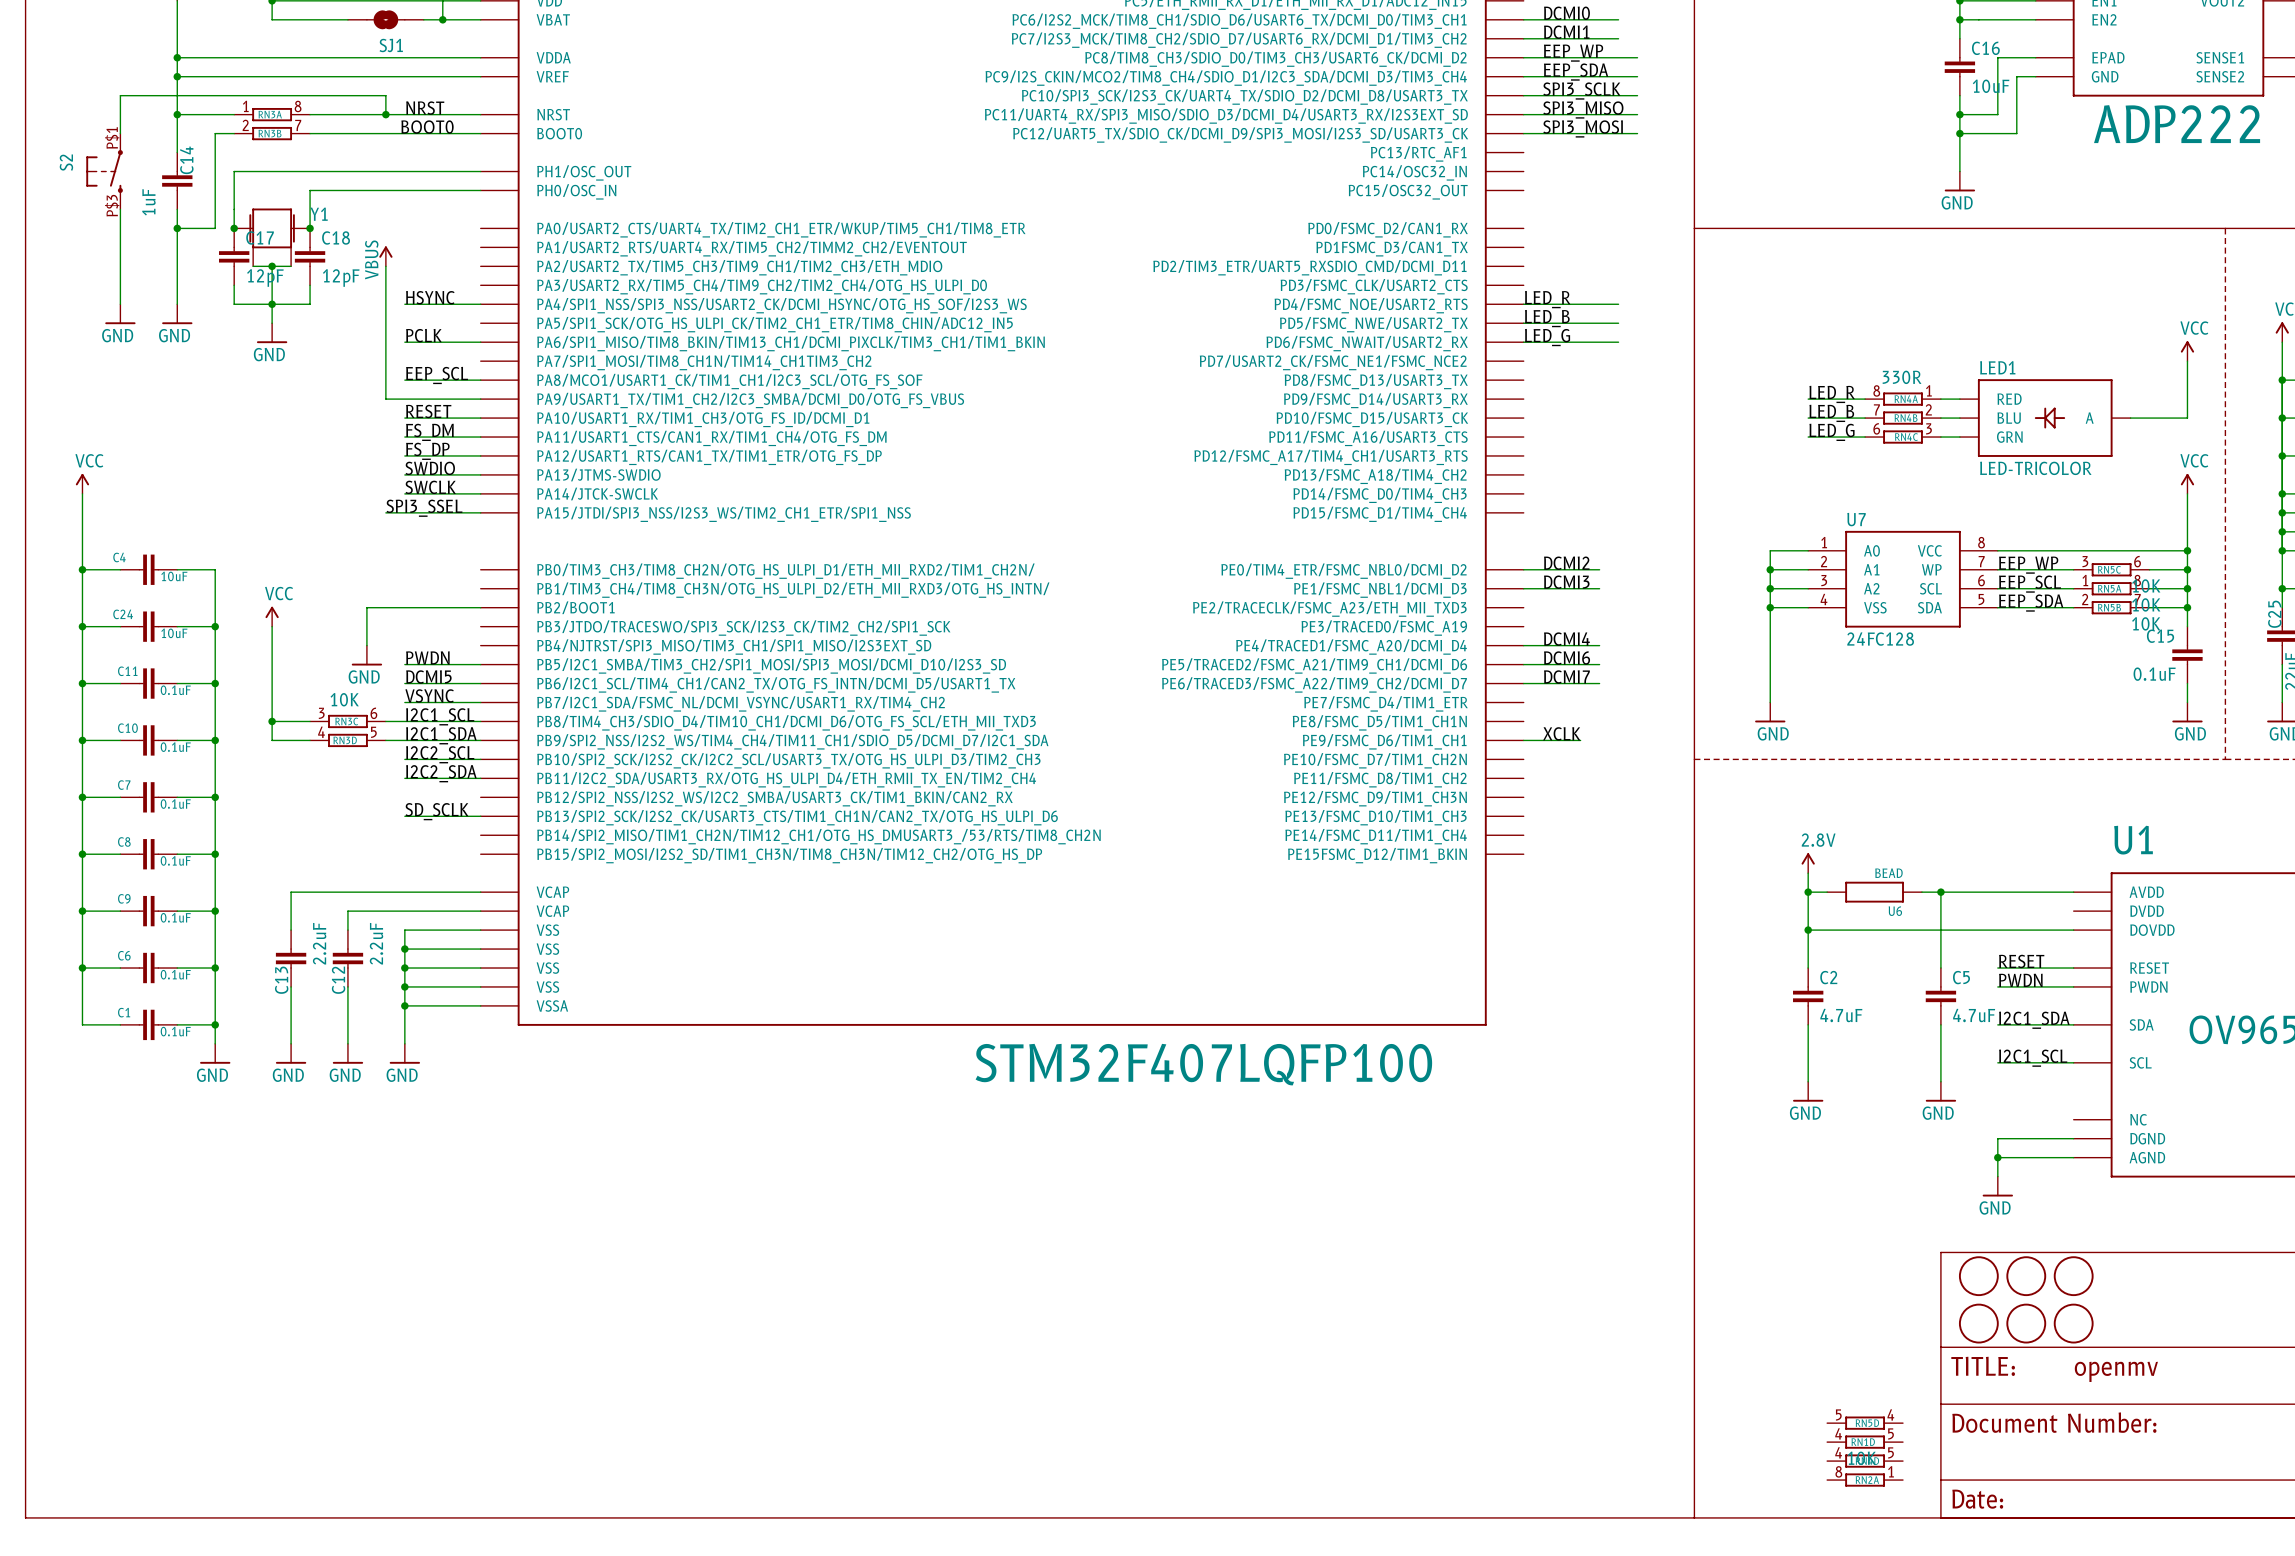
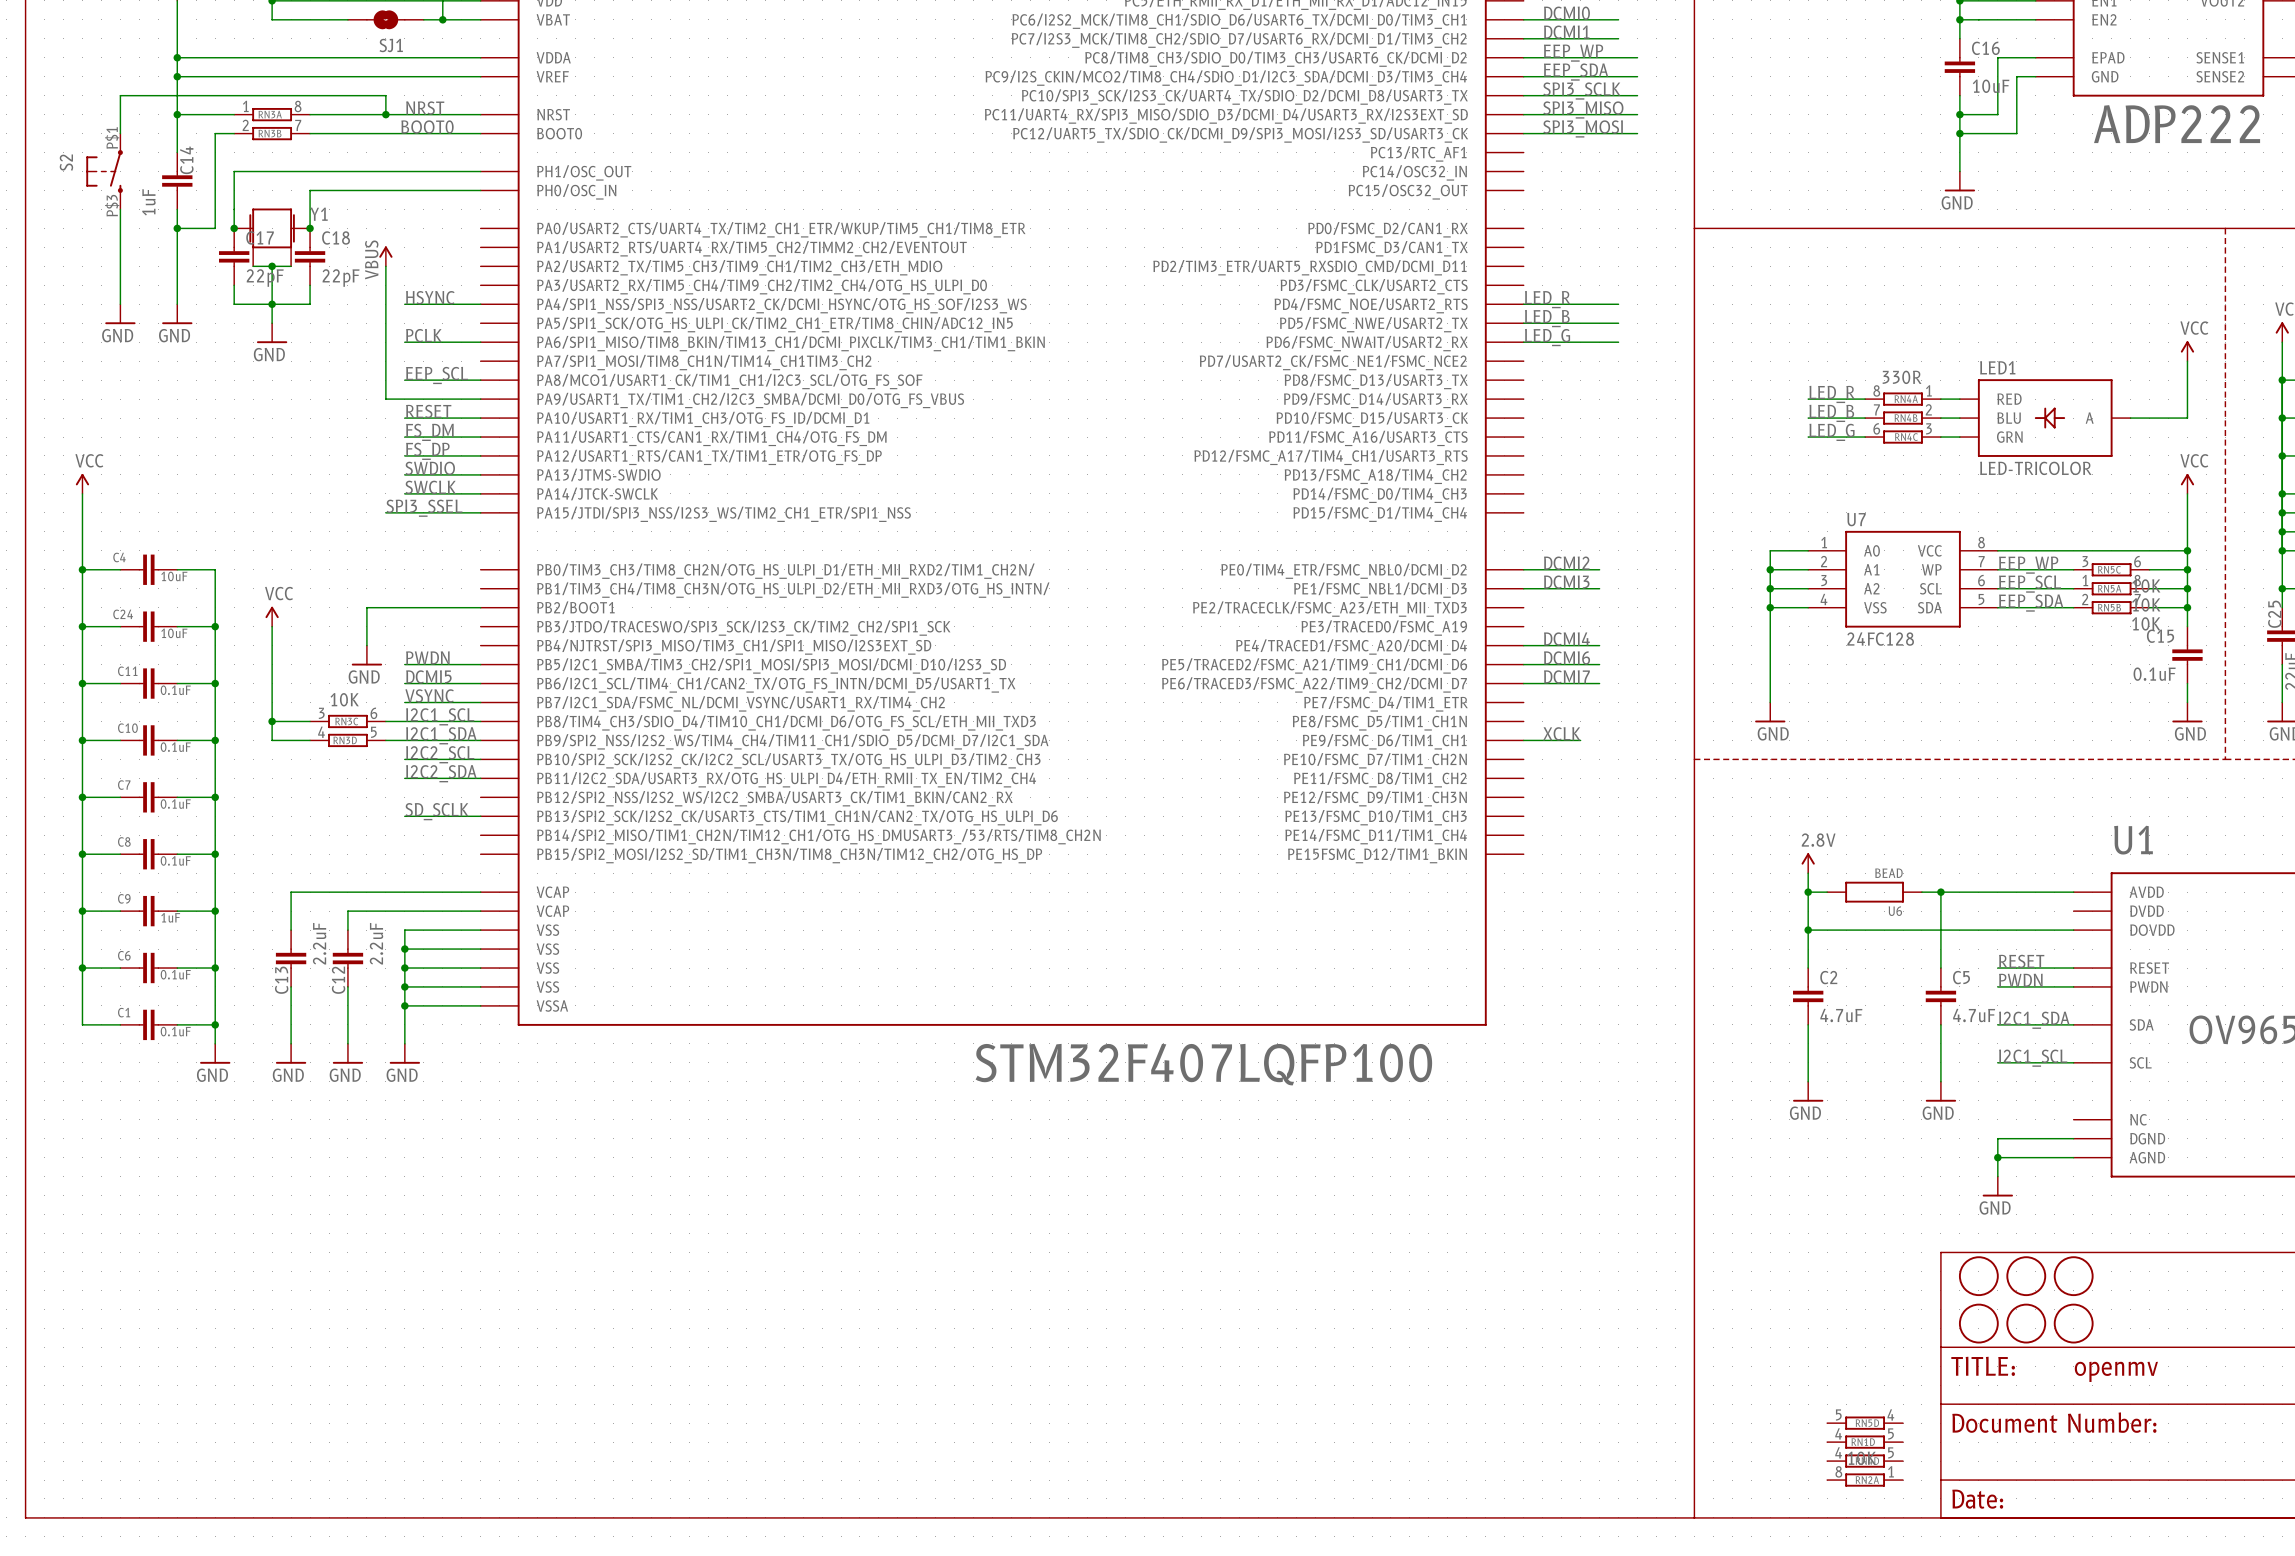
C17 value: 12pF (265, 278) -> 22pF (265, 278)
C18 value: 12pF (341, 278) -> 22pF (341, 278)
C9 value: 0.1uF (175, 917) -> 1uF (170, 917)

